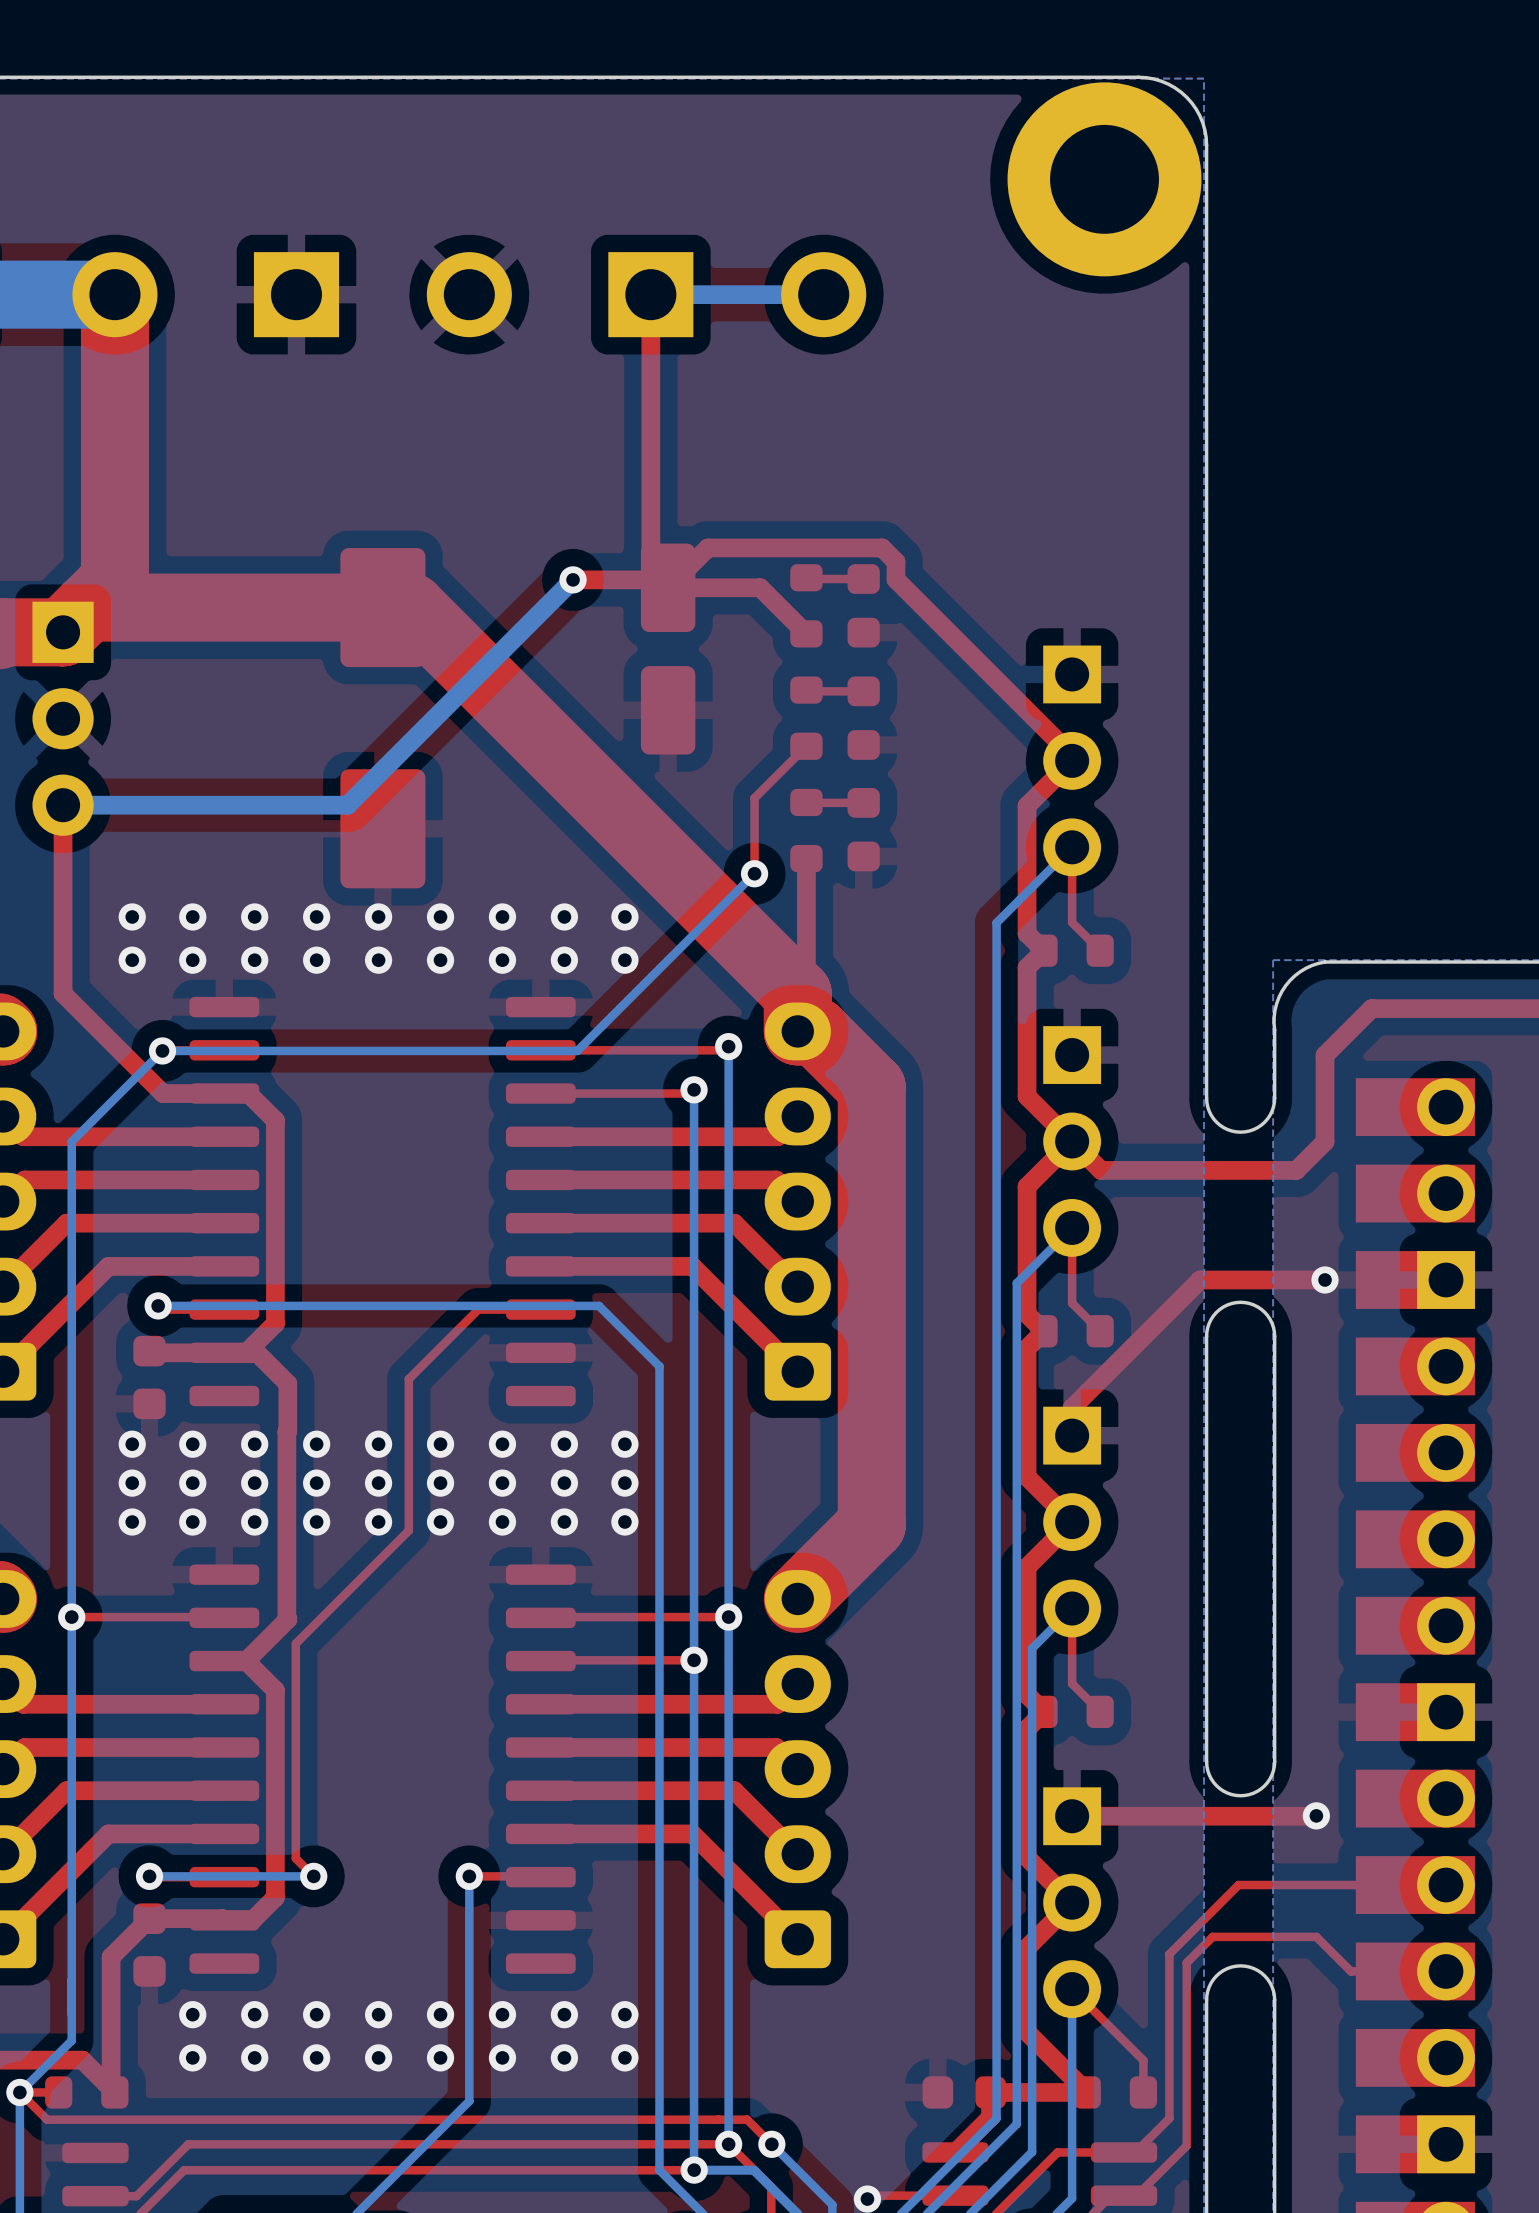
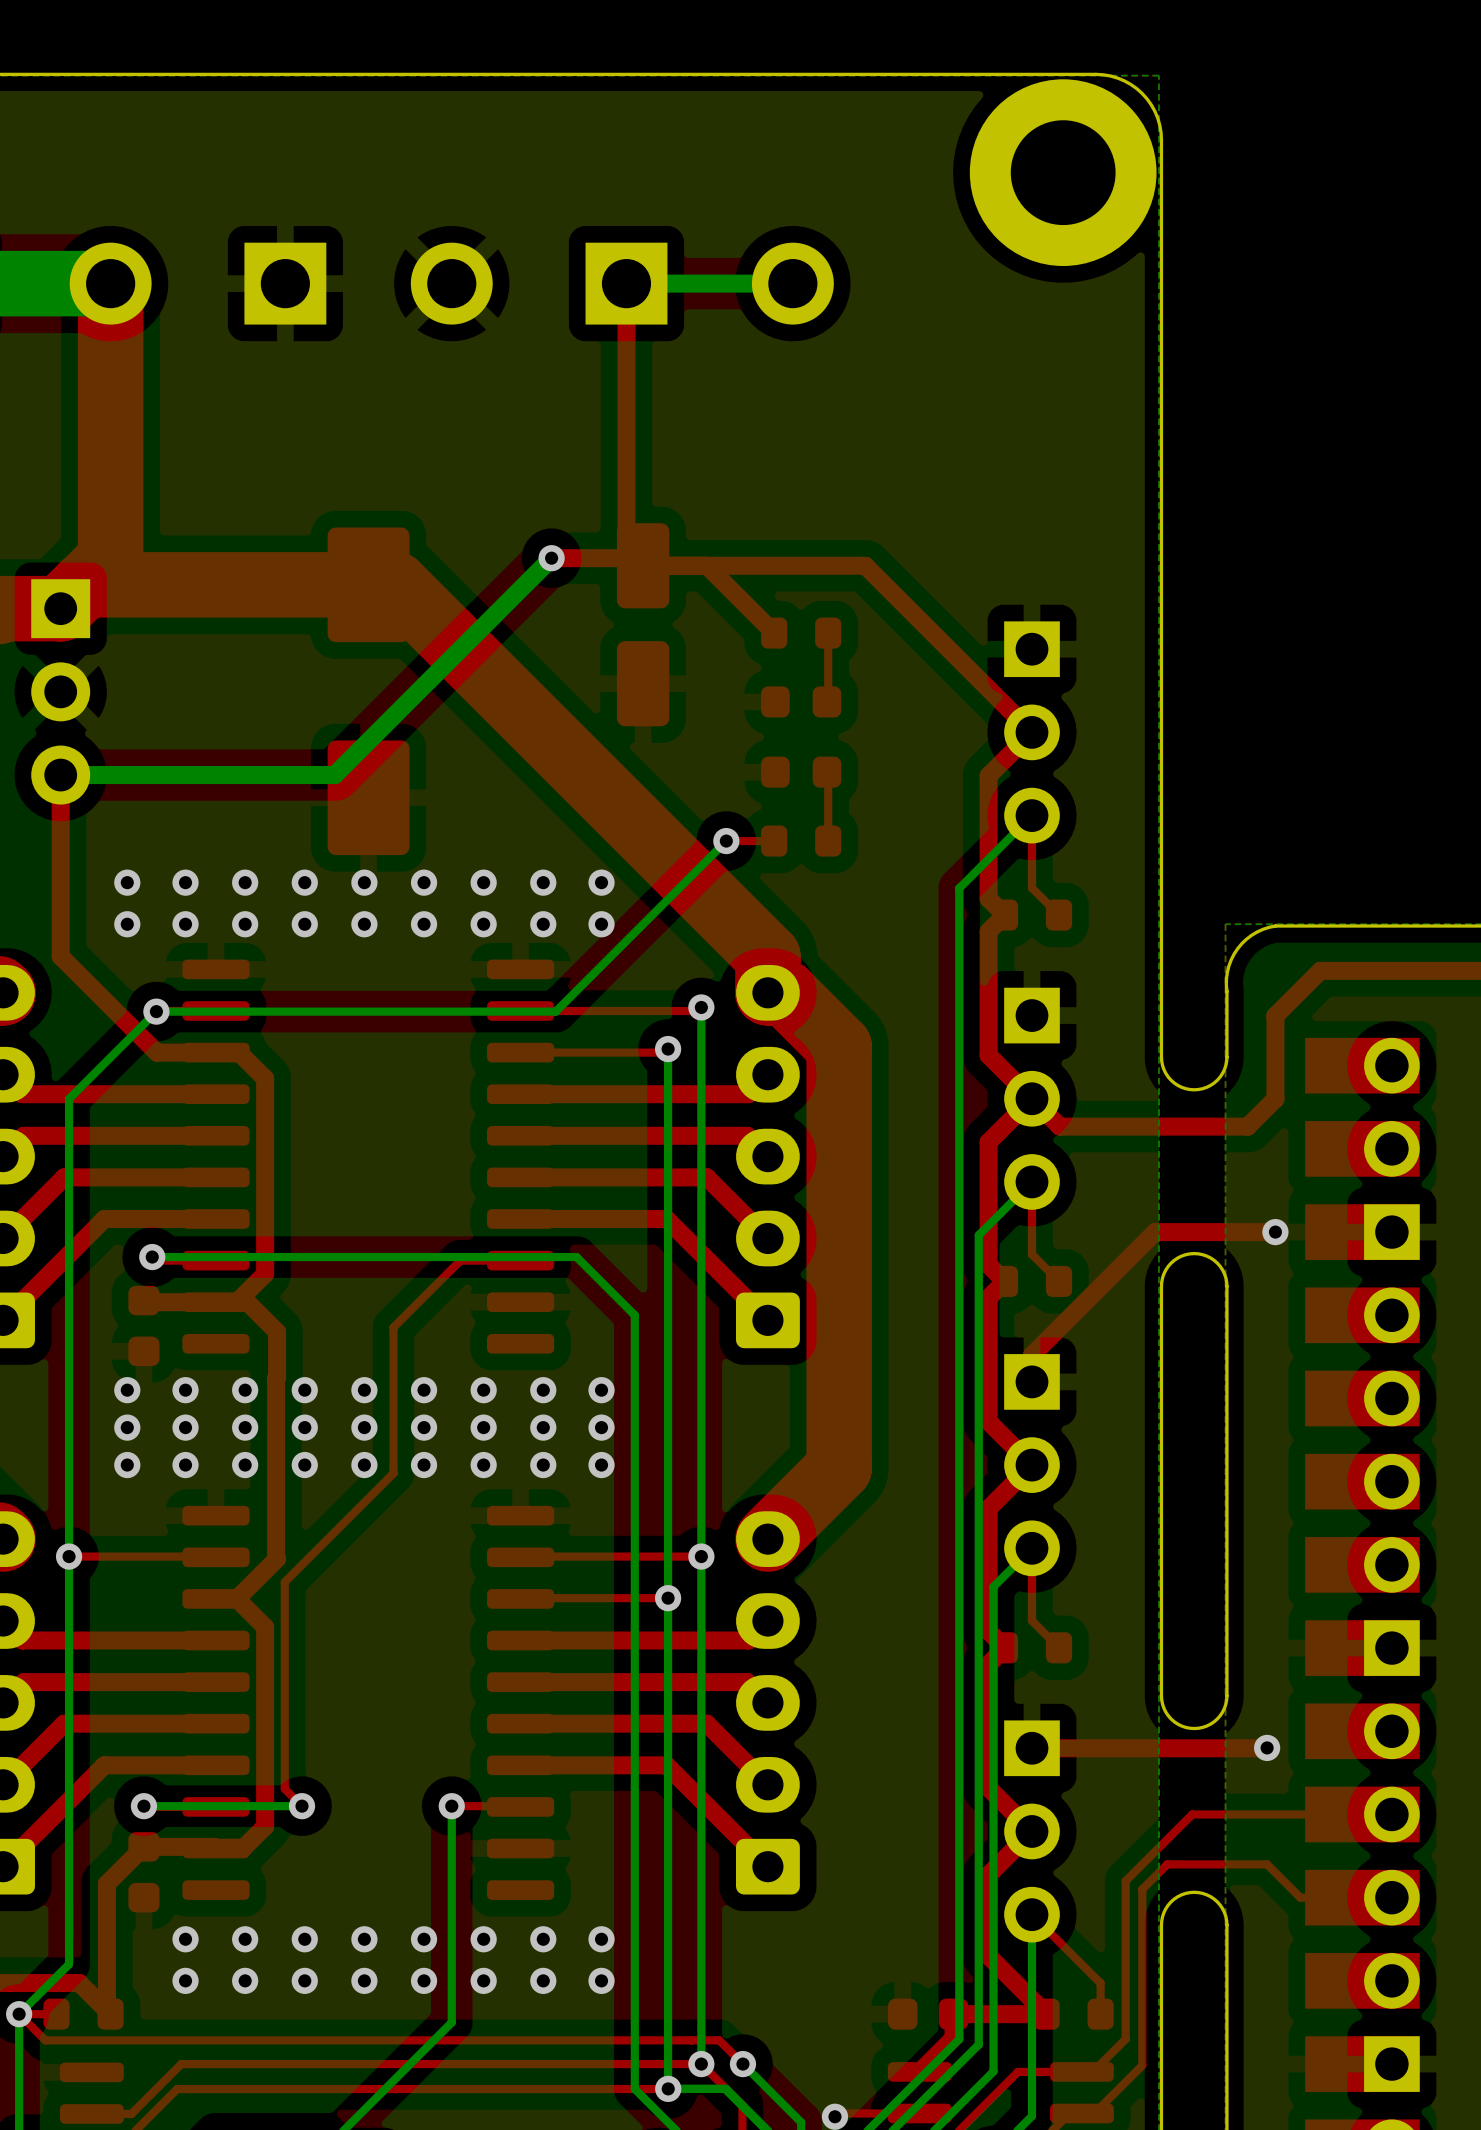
top track: (806, 577) (863, 579) -> none
top track: (668, 587) (707, 547) (882, 547) (896, 561) (896, 579) (1072, 755) (1072, 760) -> (731, 565) (865, 565) (1032, 732)
top track: none -> (706, 565) (774, 633)
top track: (760, 587) (806, 633) -> none
part: (806, 605) -> none
part: (863, 605) -> none
part: none -> (801, 633)
top track: none -> (828, 633) (827, 701)
top track: (806, 690) (863, 691) -> none
part: (806, 718) -> none
part rotation: 0° (863, 718) -> 90° clockwise (801, 701)
top track: (806, 746) (754, 798) (754, 873) -> (774, 841) (726, 841)
top track: none -> (827, 772) (828, 841)
top track: (863, 802) (806, 802) -> none
part rotation: 0° (863, 829) -> 90° clockwise (801, 772)
part rotation: 0° (806, 830) -> 90° clockwise (801, 841)
part position: (806, 830) -> (801, 841)
top track: (806, 858) (806, 1022) (797, 1031) -> none

